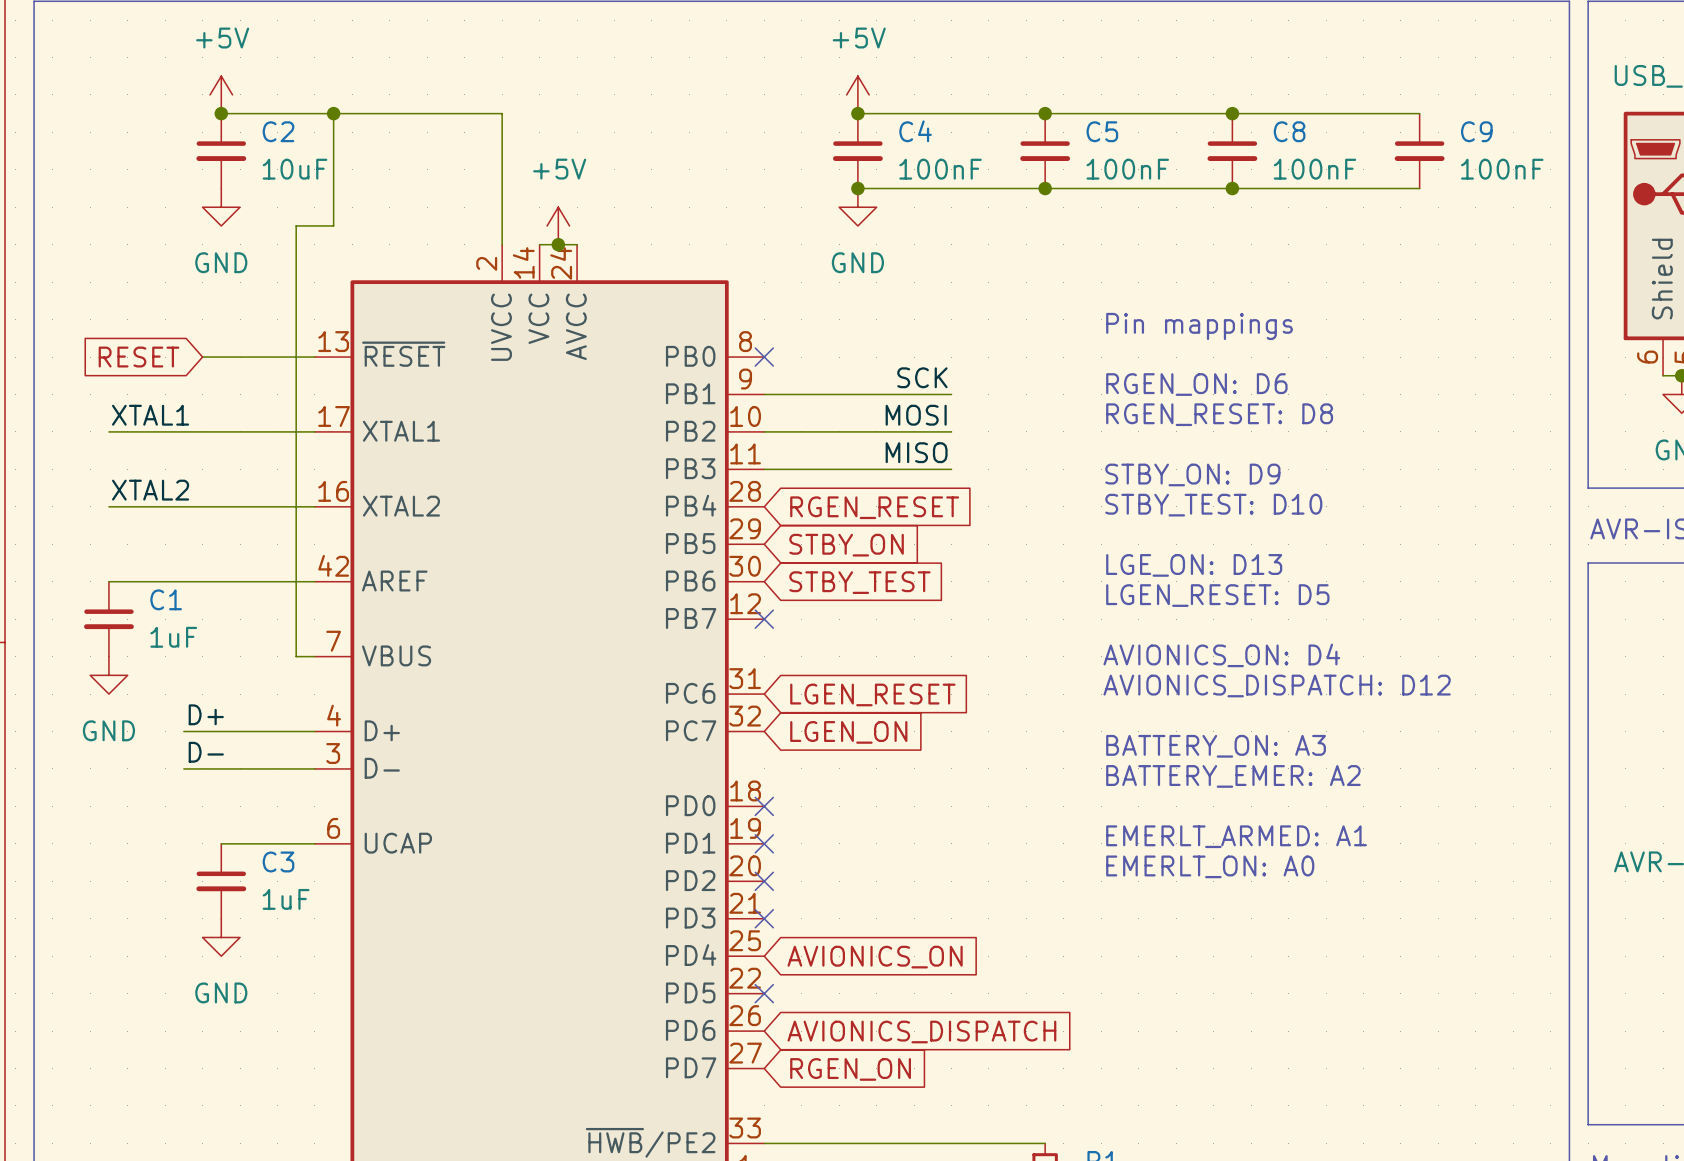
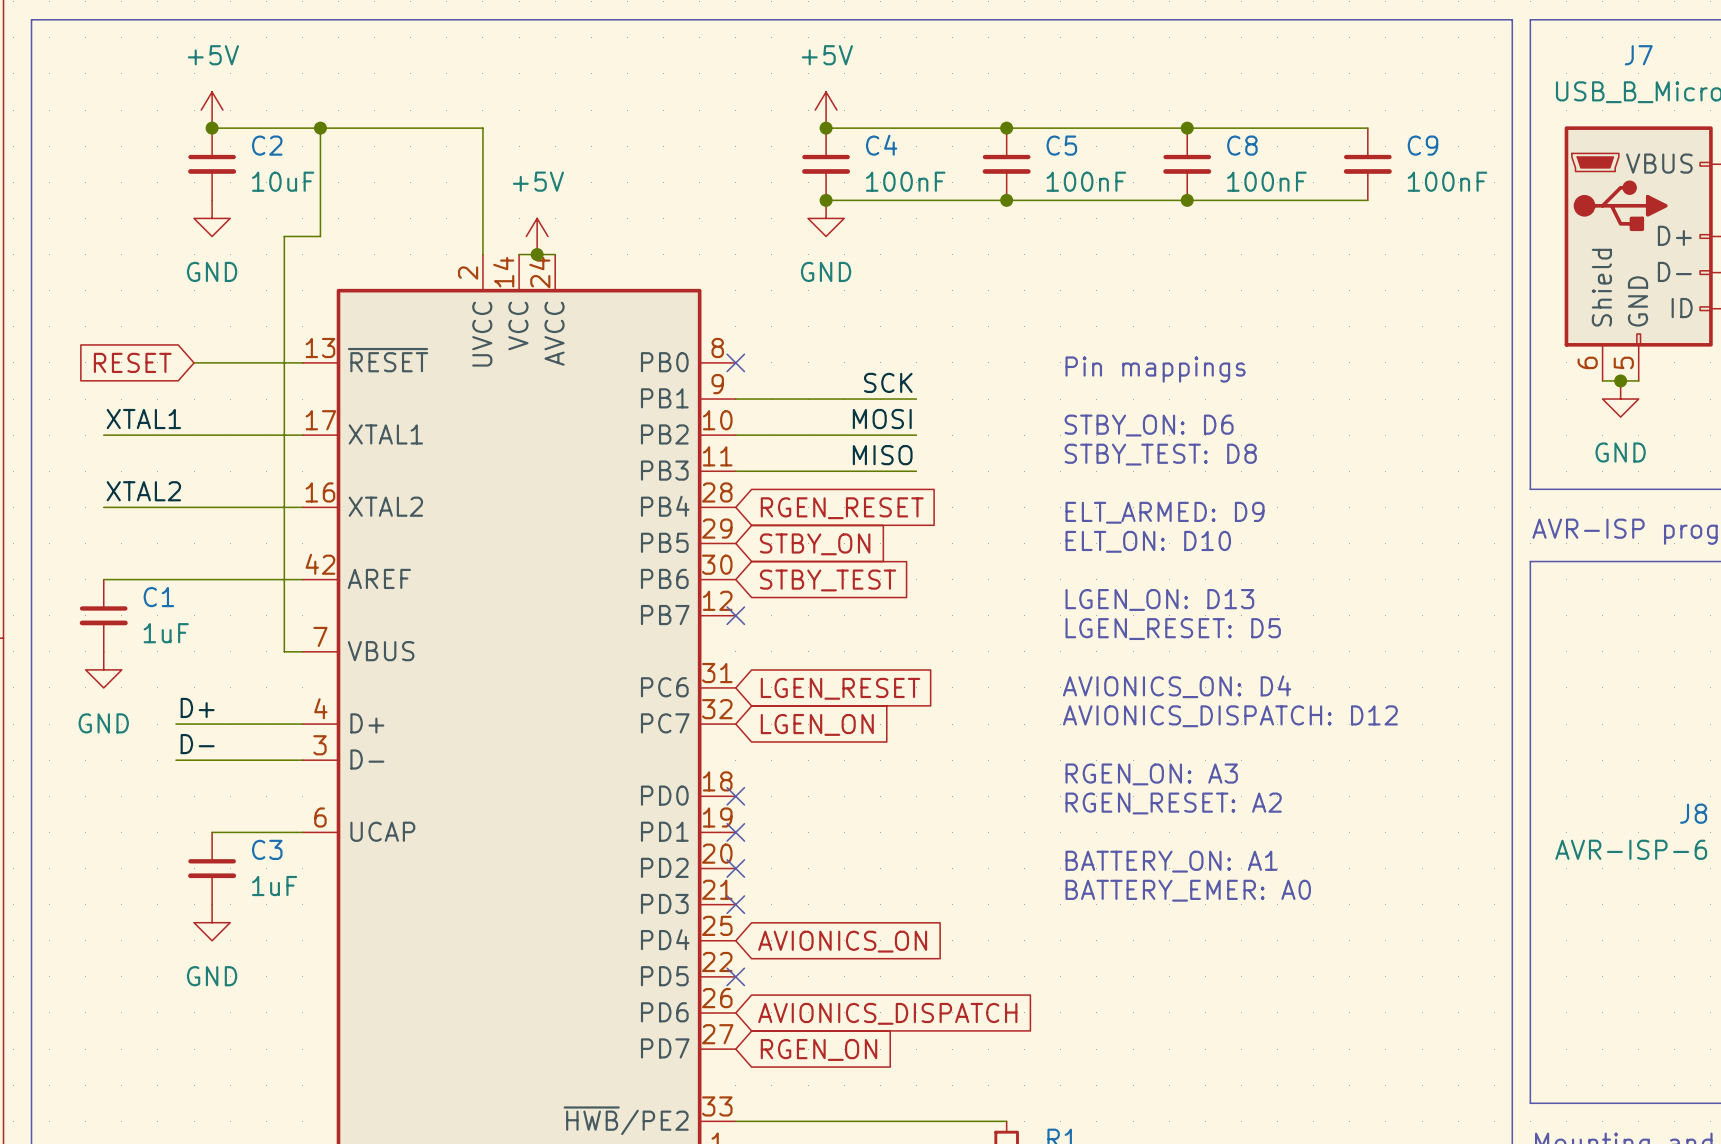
text position: Pin mappings (1199, 326) -> Pin mappings (1155, 369)
text: RGEN_ON: D6 (1196, 384) -> none
text: RGEN_RESET: D8 (1219, 414) -> STBY_ON: D6 (1149, 425)
text: STBY_ON: D9 (1192, 474) -> STBY_TEST: D8 (1160, 454)
text: STBY_TEST: D10 (1213, 505) -> ELT_ARMED: D9 (1165, 512)
text: none -> ELT_ON: D10 (1148, 541)
text: LGE_ON: D13 (1194, 565) -> none
text position: LGEN_RESET: D5 (1217, 595) -> LGEN_RESET: D5 (1173, 629)
text: none -> LGEN_ON: D13 (1159, 599)
text position: AVIONICS_ON: D4 (1221, 655) -> AVIONICS_ON: D4 (1177, 686)
text position: AVIONICS_DISPATCH: D12 (1277, 685) -> AVIONICS_DISPATCH: D12 (1230, 716)
text: BATTERY_ON: A3 (1216, 746) -> none
text: BATTERY_EMER: A2 (1233, 776) -> RGEN_ON: A3 (1151, 774)
text: none -> RGEN_RESET: A2 (1173, 803)
text: EMERLT_ARMED: A1 (1236, 836) -> none
text: EMERLT_ON: A0 (1210, 866) -> BATTERY_ON: A1 (1171, 861)
text: none -> BATTERY_EMER: A0 (1188, 890)

